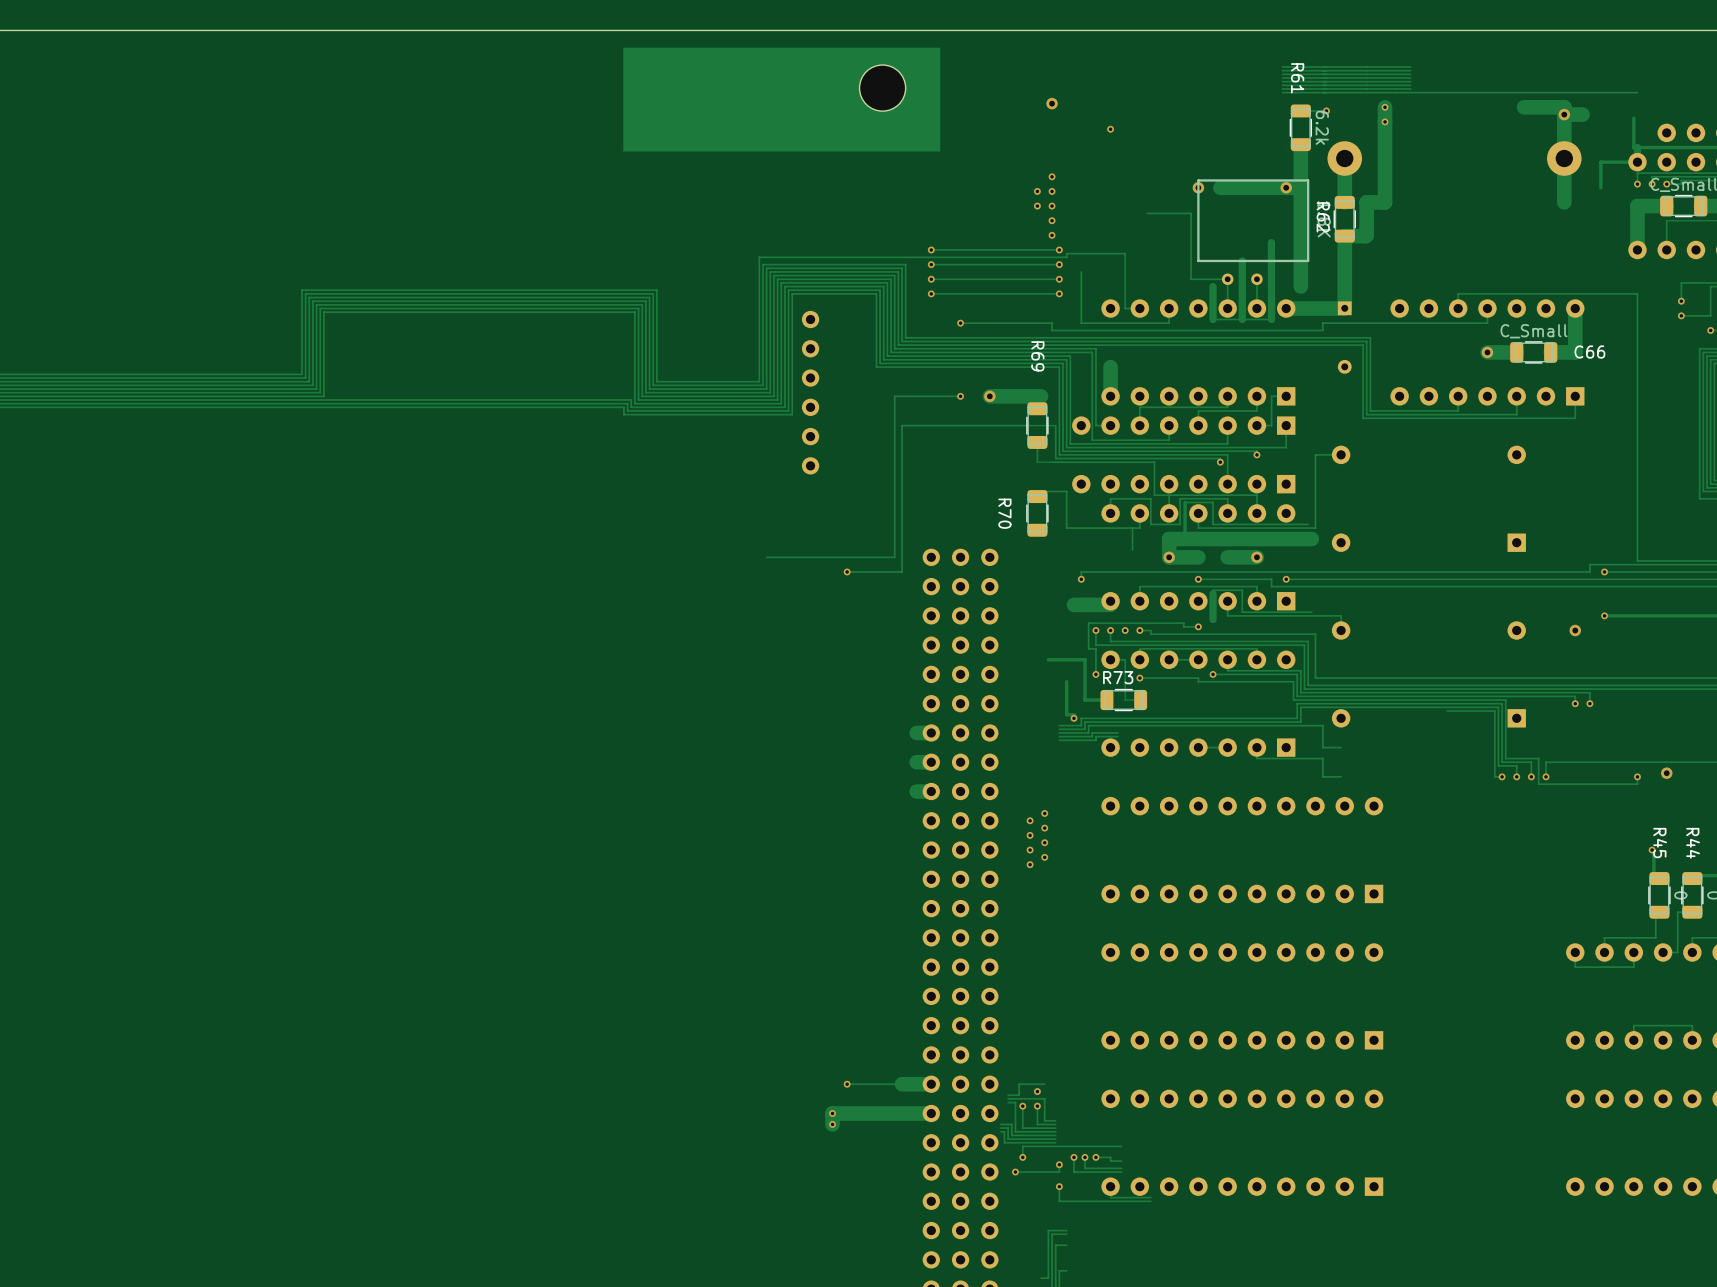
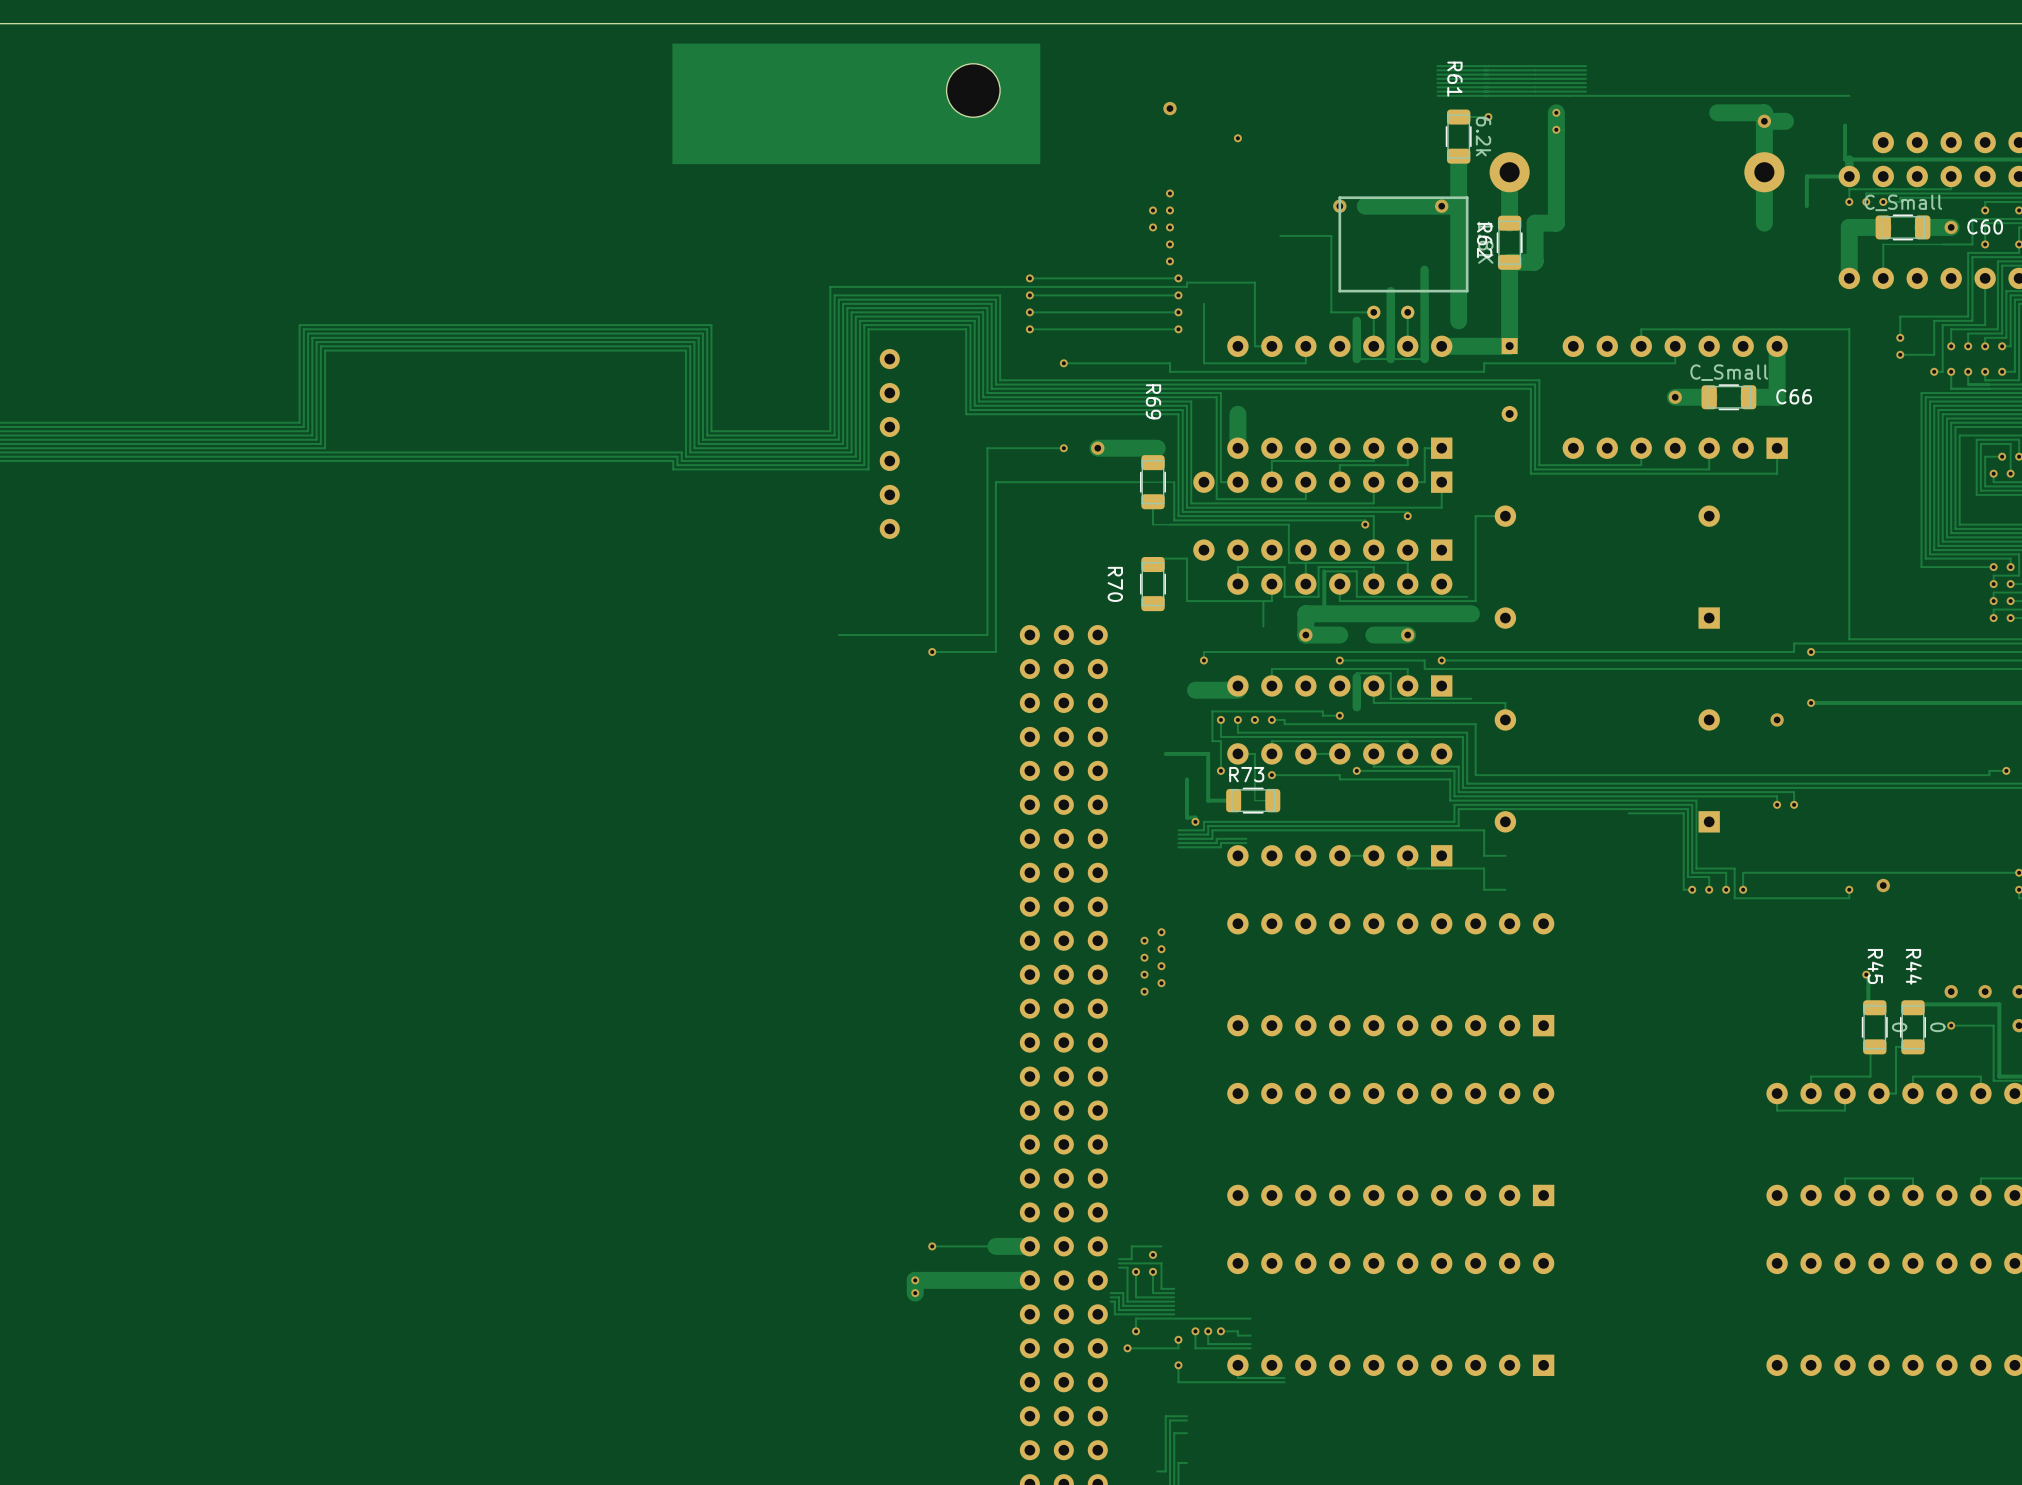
track: (931, 732) (916, 732) -> none
track: (931, 762) (916, 762) -> none
track: (931, 791) (916, 791) -> none

